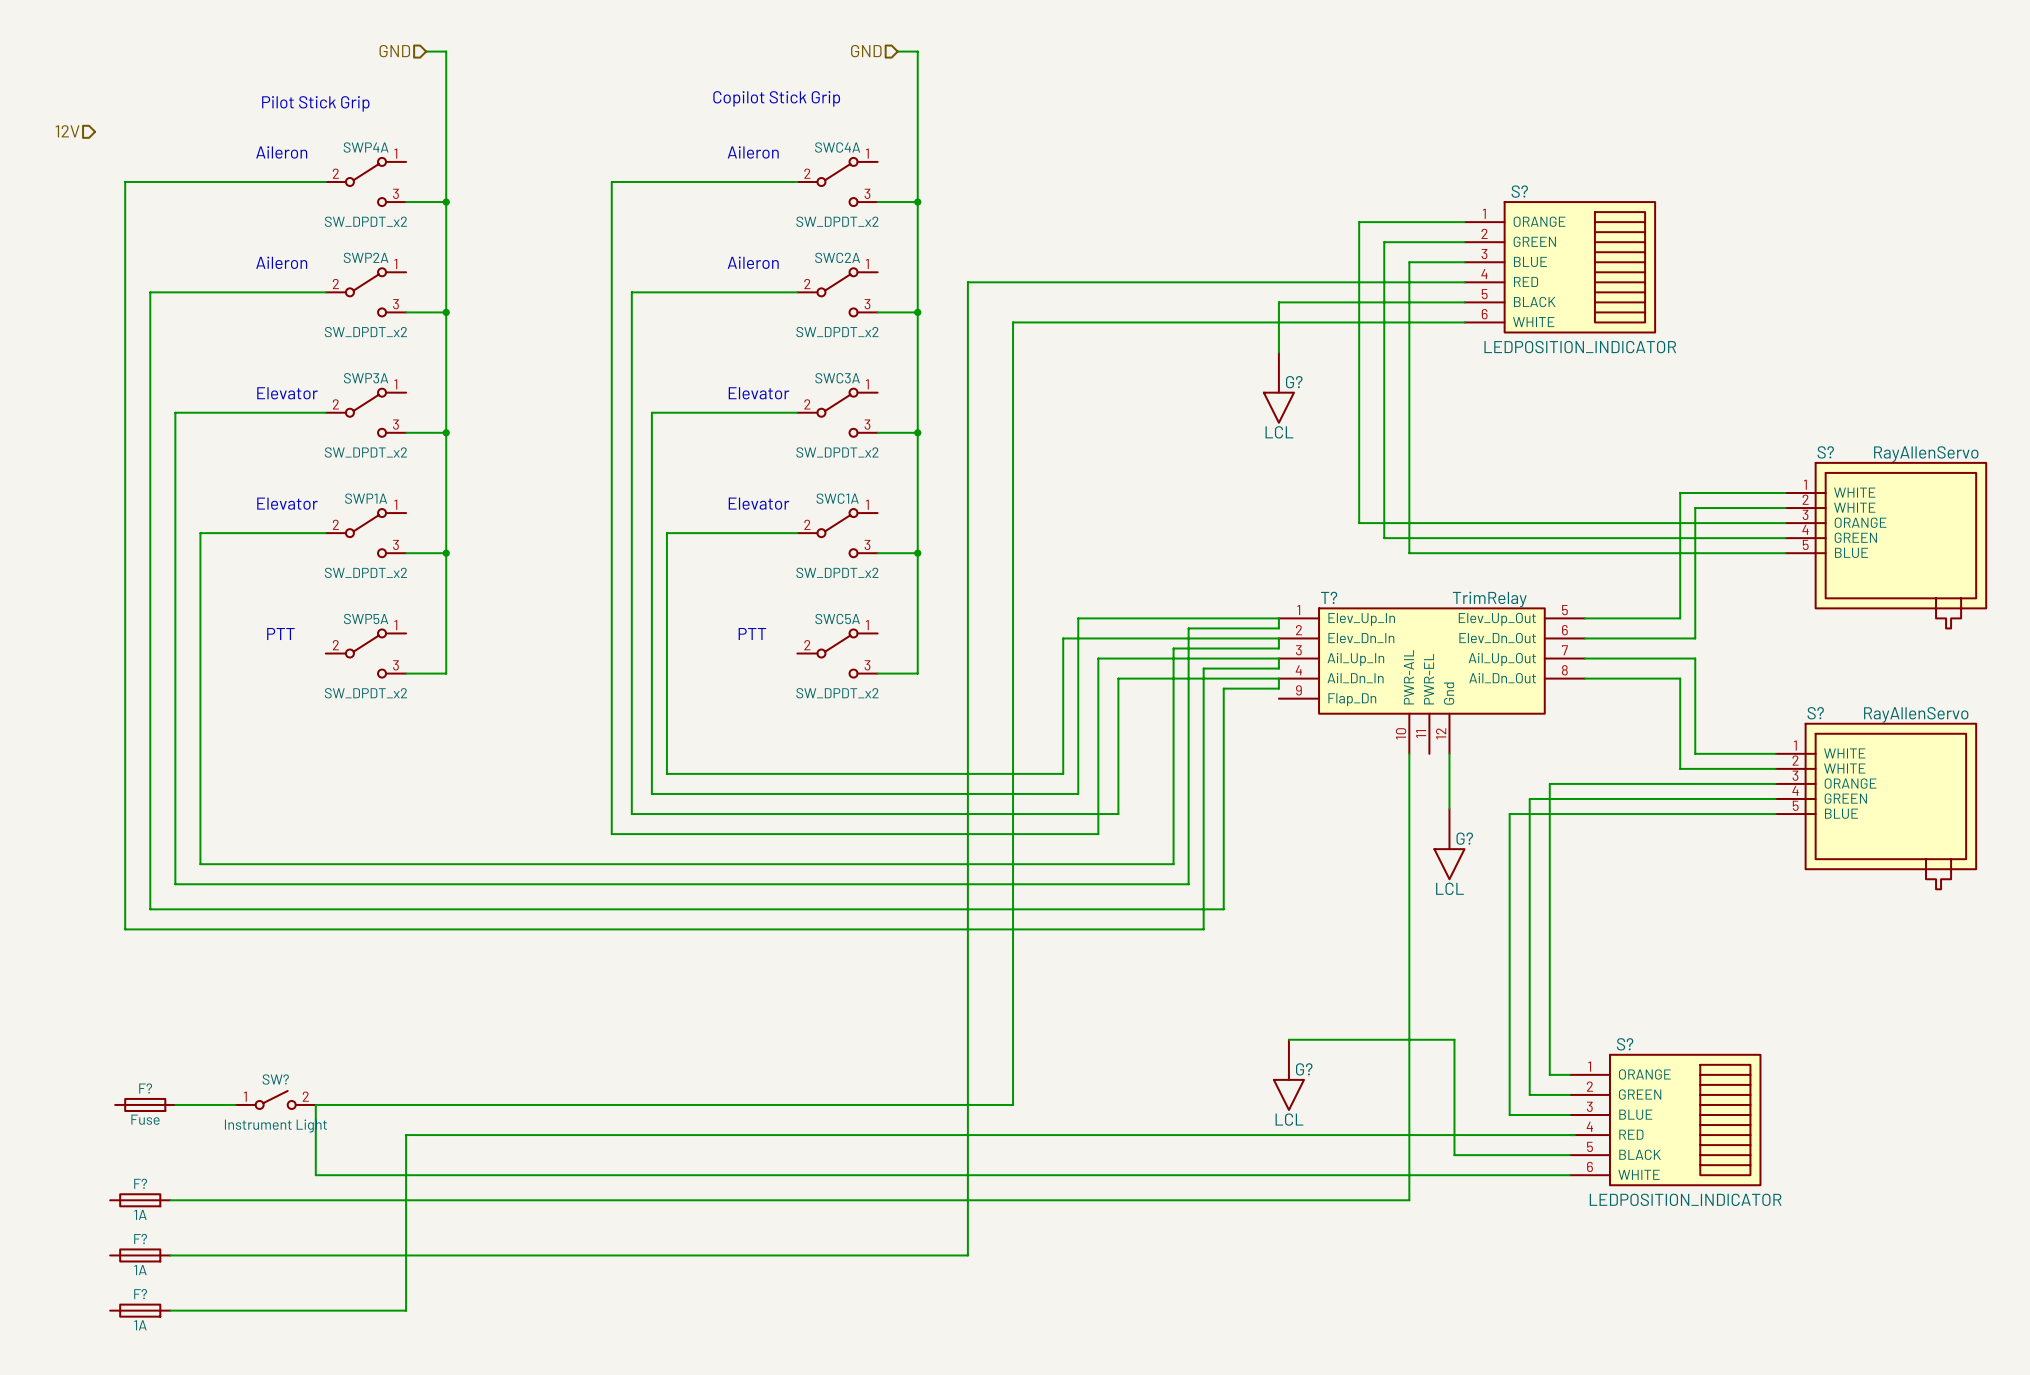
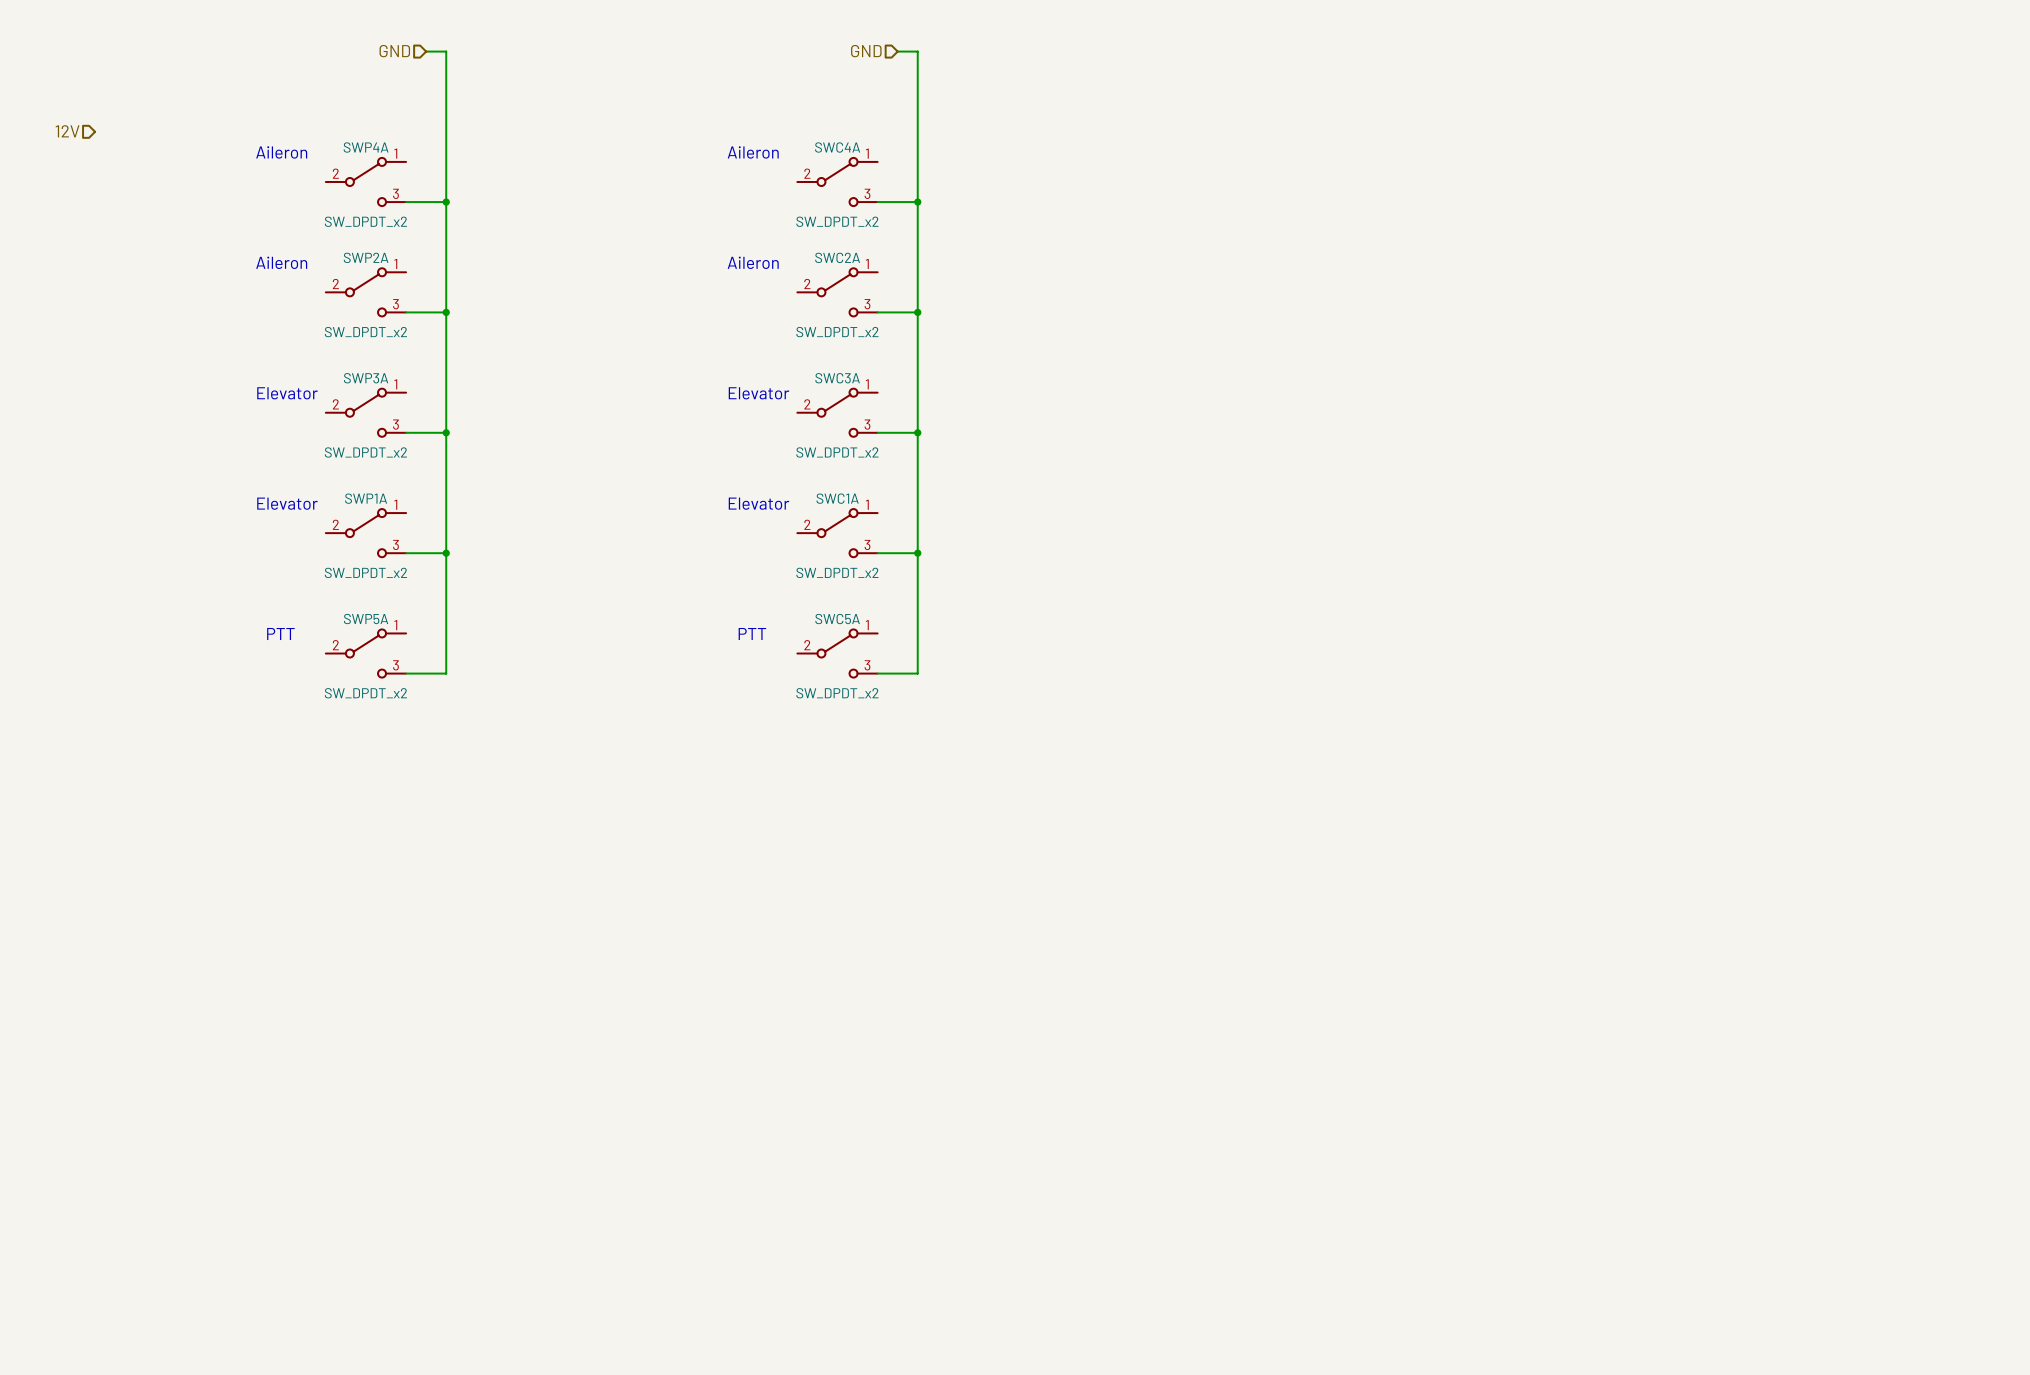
text: Copilot Stick Grip (776, 98) -> none
text: Pilot Stick Grip (315, 103) -> none
wire: (325, 181) (125, 181) (125, 929) (1203, 929) (1203, 668) (1278, 668) (1278, 658) (1098, 658) (1098, 834) (611, 834) (611, 181) (797, 181) -> none
wire: (1464, 222) (1359, 222) (1359, 523) (1785, 523) -> none
wire: (1464, 242) (1384, 242) (1384, 538) (1785, 538) -> none
wire: (1464, 262) (1409, 262) (1409, 553) (1785, 553) -> none
S?: LEDPOSITION_INDICATOR (1559, 267) -> none
wire: (1464, 282) (967, 282) (967, 1255) (170, 1255) -> none
wire: (325, 292) (150, 292) (150, 909) (1223, 909) (1223, 688) (1278, 688) (1278, 678) (1118, 678) (1118, 814) (631, 814) (631, 292) (797, 292) -> none
wire: (1464, 302) (1278, 302) (1278, 352) -> none
wire: (1464, 322) (1013, 322) (1013, 1104) (315, 1104) (315, 1175) (1569, 1175) -> none
G?: LCL (1278, 387) -> none
wire: (325, 412) (175, 412) (175, 884) (1188, 884) (1188, 628) (1278, 628) (1278, 618) (1078, 618) (1078, 793) (651, 793) (651, 412) (797, 412) -> none
wire: (1785, 492) (1680, 492) (1680, 618) (1584, 618) -> none
wire: (1785, 508) (1695, 508) (1695, 638) (1584, 638) -> none
wire: (325, 533) (200, 533) (200, 864) (1173, 864) (1173, 648) (1278, 648) (1278, 638) (1063, 638) (1063, 773) (666, 773) (666, 533) (797, 533) -> none
S?: RayAllenServo (1885, 545) -> none
wire: (1584, 658) (1695, 658) (1695, 753) (1775, 753) -> none
wire: (1584, 678) (1680, 678) (1680, 768) (1775, 768) -> none
T?: TrimRelay (1431, 681) -> none
wire: (1409, 753) (1409, 1200) (170, 1200) -> none
wire: (1449, 753) (1449, 809) -> none
wire: (1775, 783) (1549, 783) (1549, 1074) (1569, 1074) -> none
wire: (1775, 798) (1529, 798) (1529, 1094) (1569, 1094) -> none
S?: RayAllenServo (1875, 806) -> none
wire: (1775, 814) (1509, 814) (1509, 1115) (1569, 1115) -> none
G?: LCL (1449, 844) -> none
wire: (1288, 1039) (1454, 1039) (1454, 1155) (1569, 1155) -> none
G?: LCL (1288, 1074) -> none
SW?: Instrument Light (275, 1099) -> none
F?: Fuse (145, 1104) -> none
wire: (175, 1104) (235, 1104) -> none
S?: LEDPOSITION_INDICATOR (1665, 1120) -> none
wire: (1574, 1135) (406, 1135) (406, 1310) (170, 1310) -> none
F?: 1A (140, 1200) -> none
F?: 1A (140, 1255) -> none
F?: 1A (140, 1310) -> none

